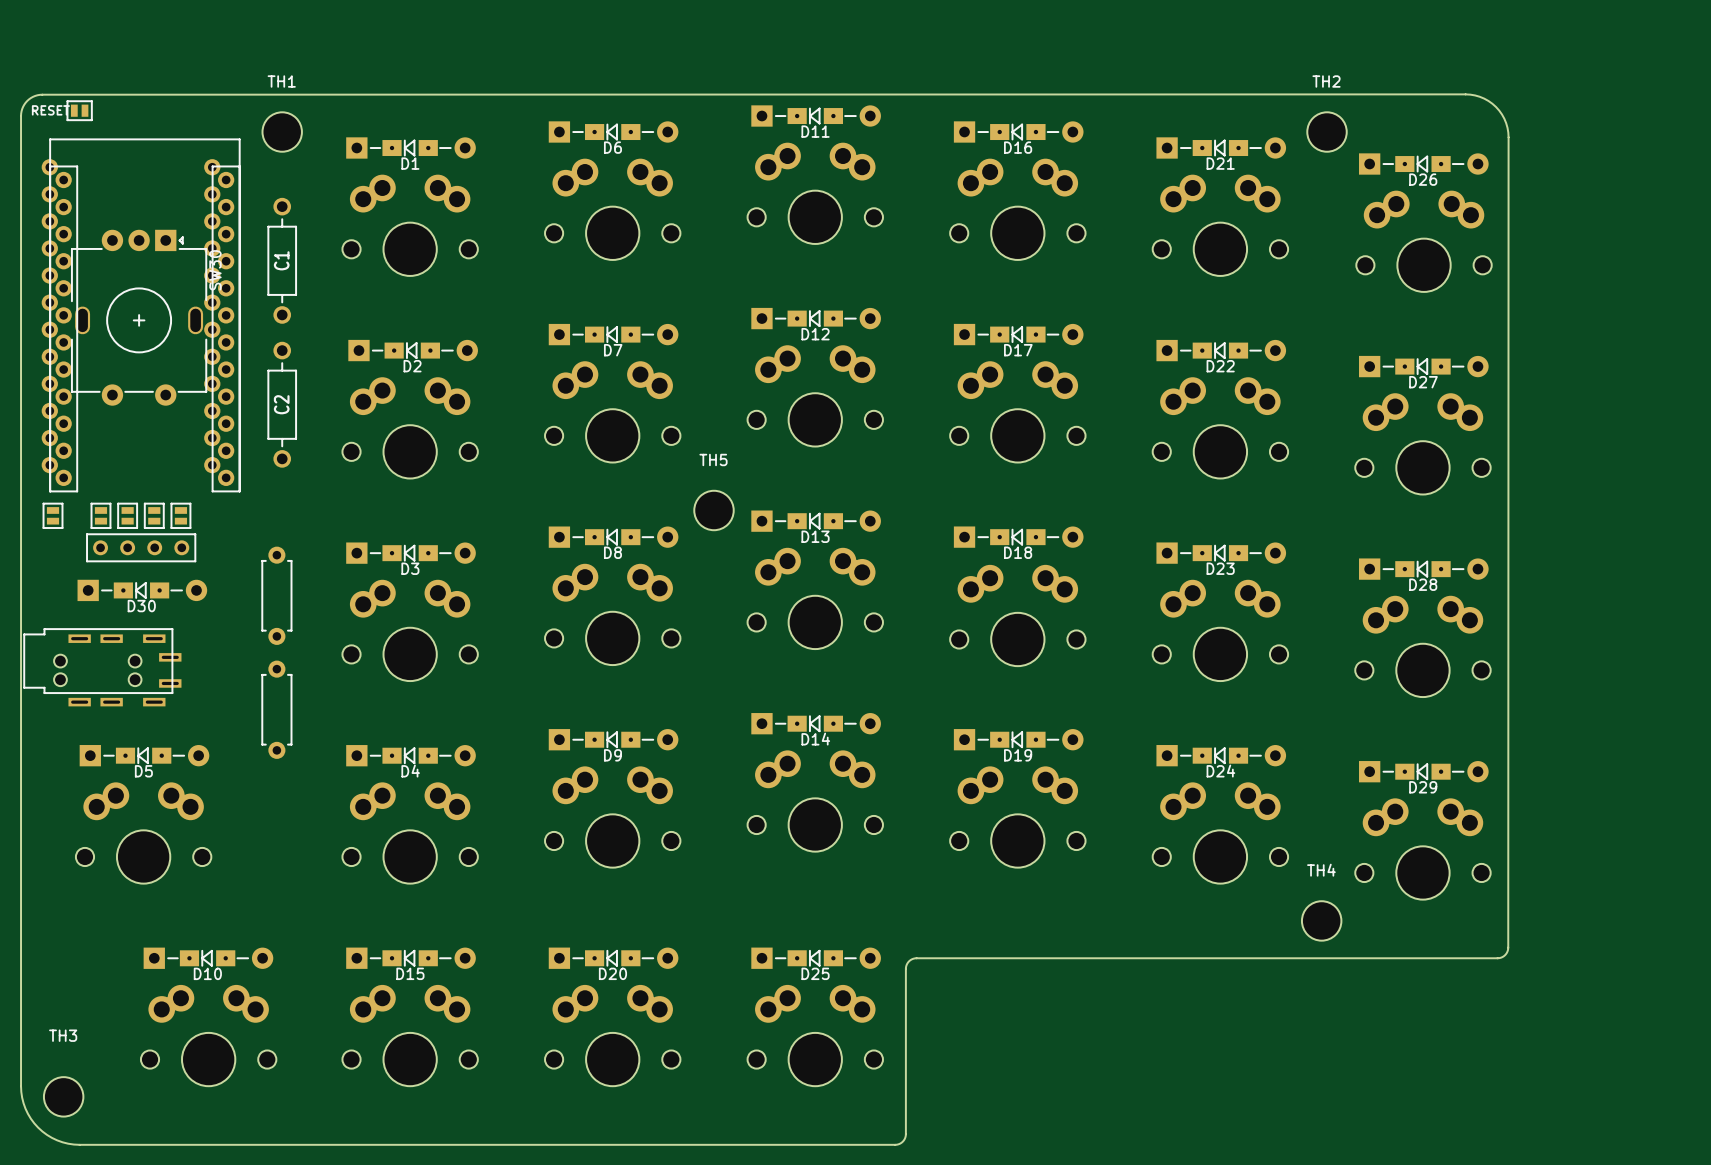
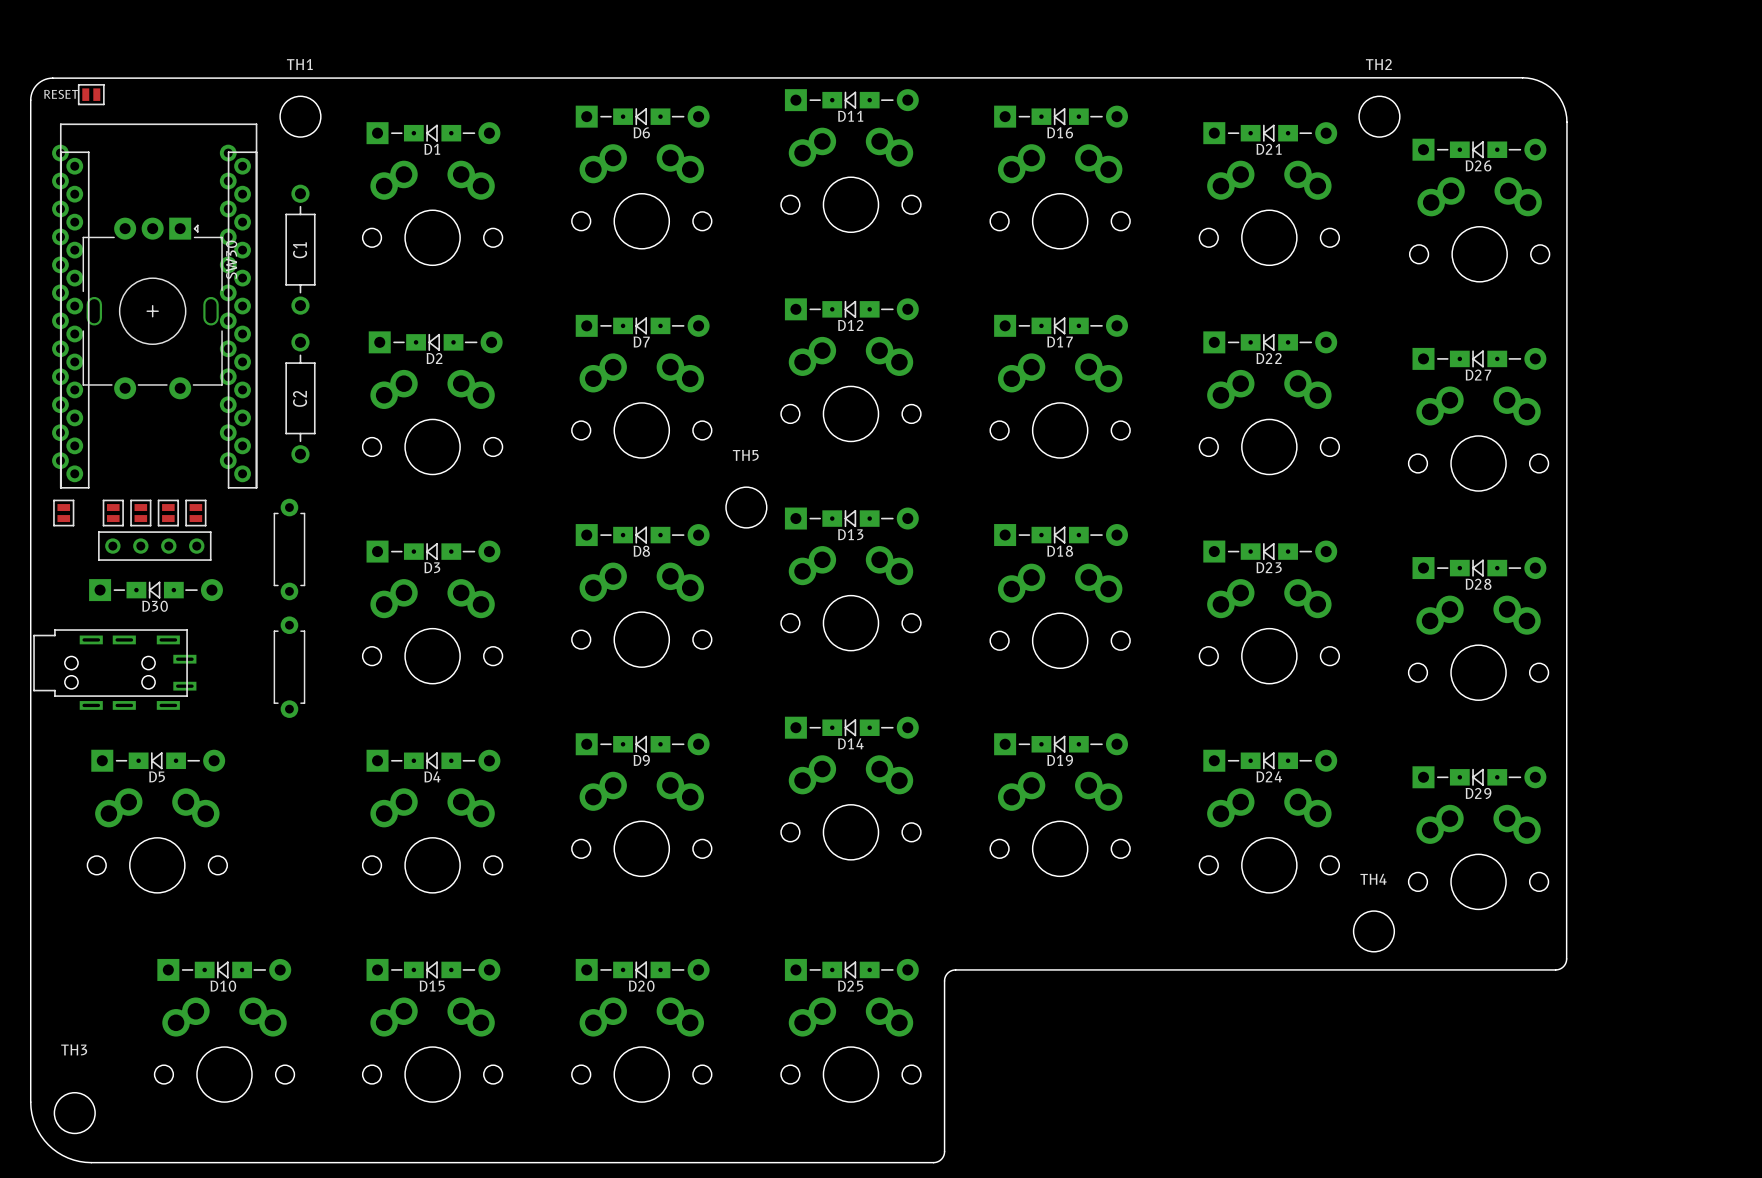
part: none -> (289, 549)
part: (276, 595) -> none
part: none -> (289, 667)
part: (276, 709) -> none

